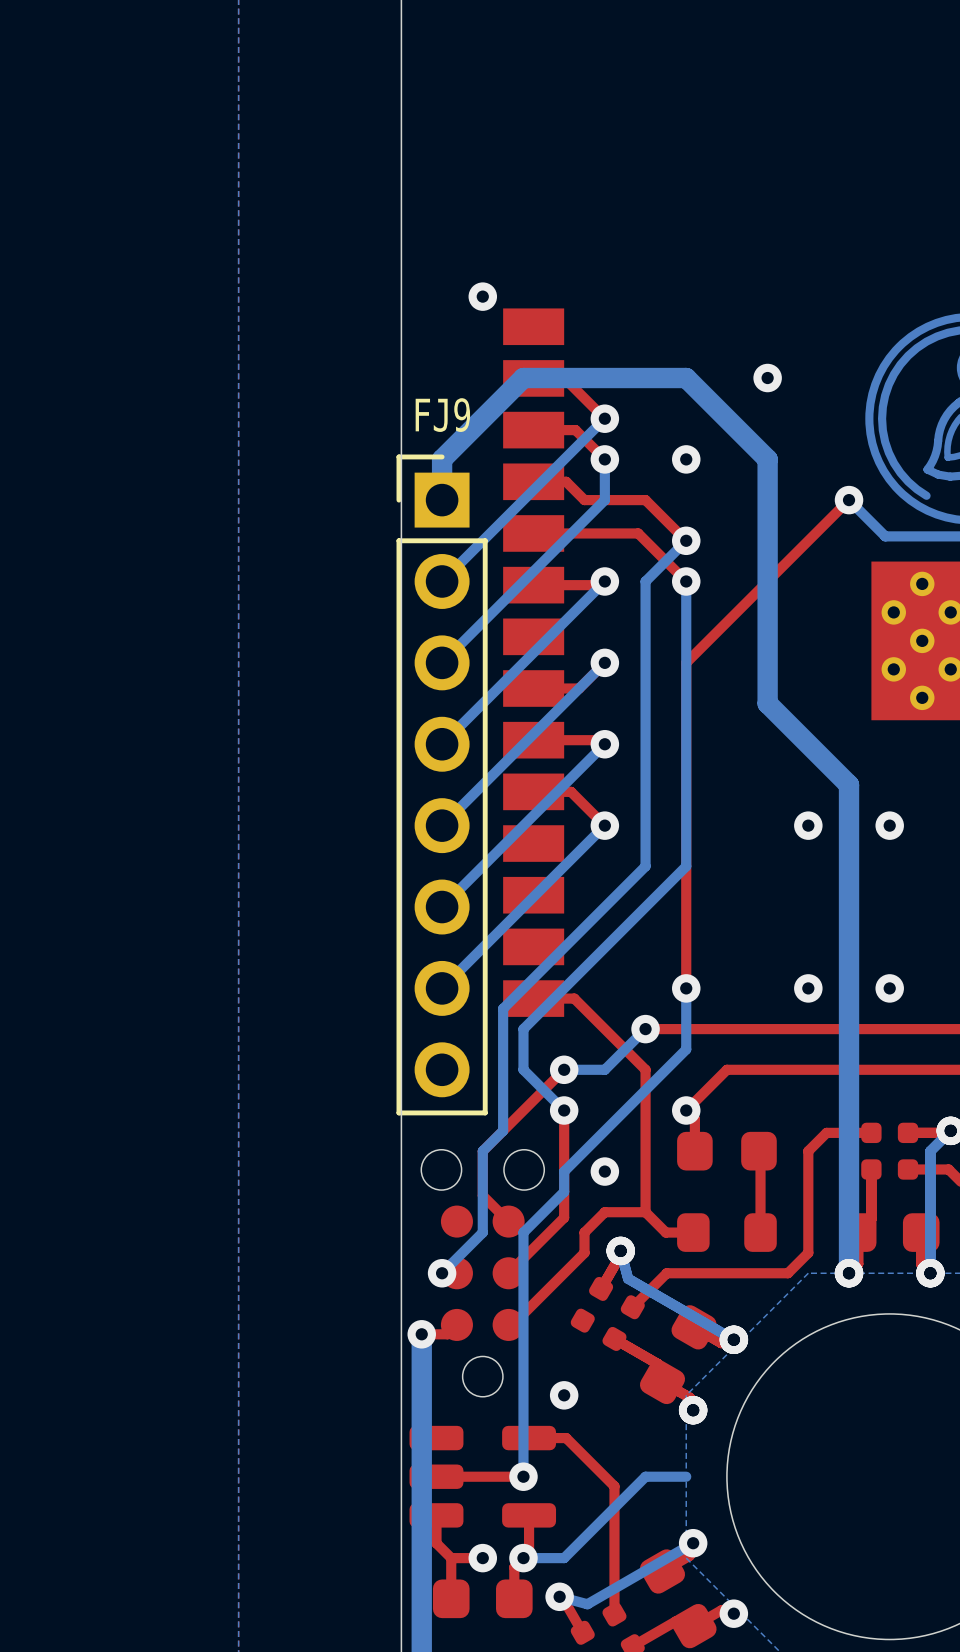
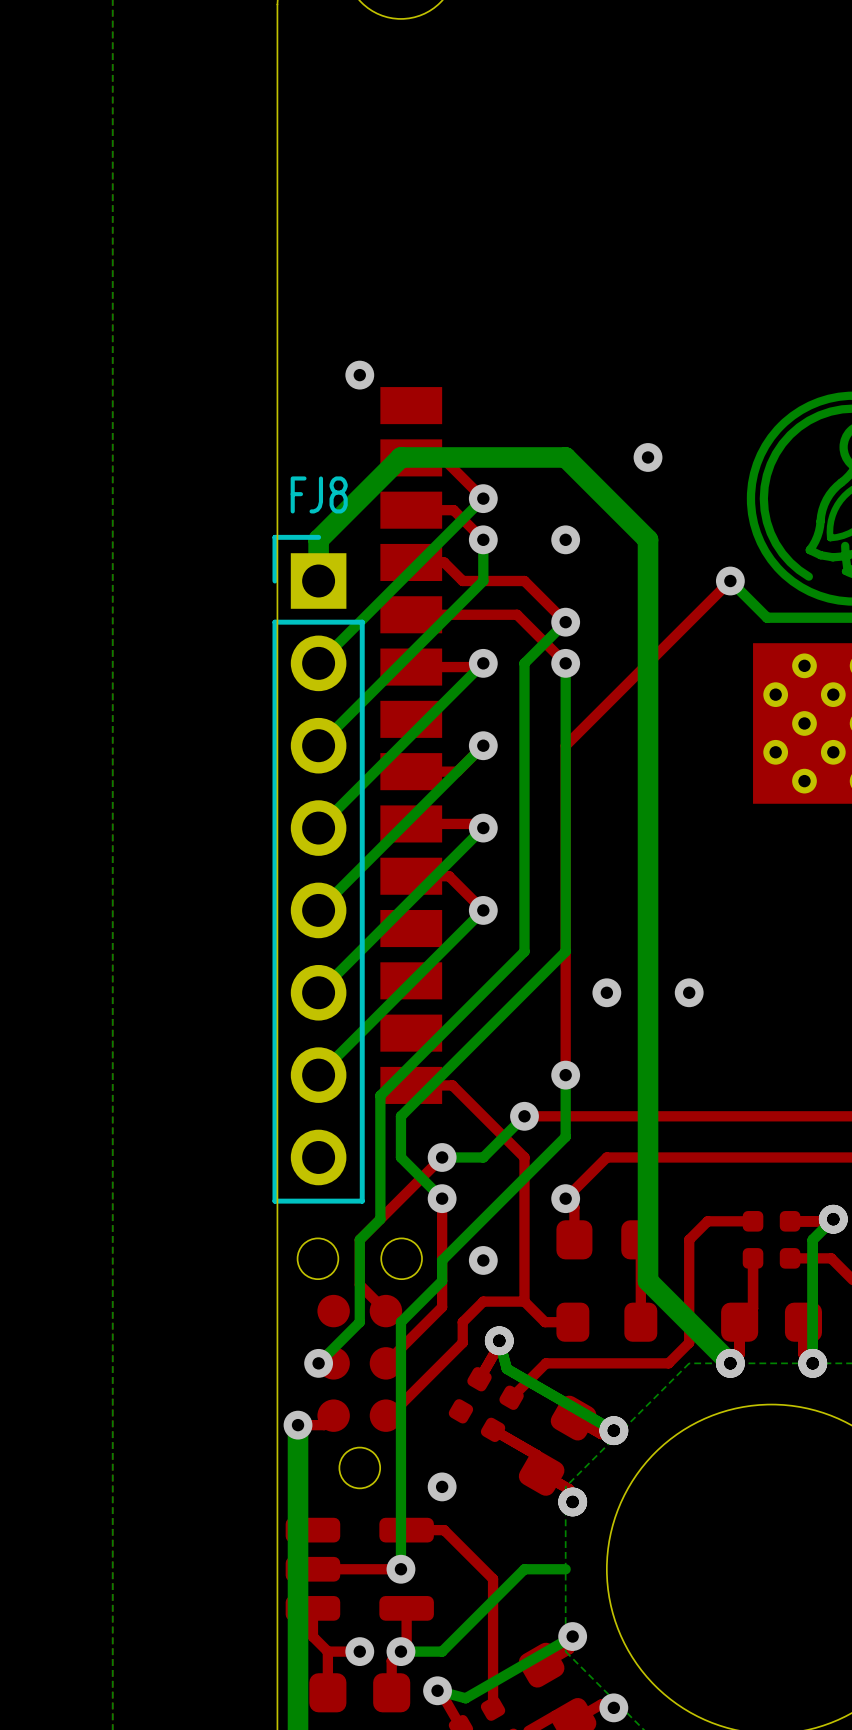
FJ9 name: FJ9 (442, 415) -> FJ8 (319, 494)
bottom track: (767, 703) (849, 784) (849, 1273) -> (648, 786) (648, 1281) (730, 1363)
via: (808, 825) -> none
via: (889, 825) -> none
via: none -> (606, 992)
via: none -> (689, 992)
via: (808, 988) -> none
via: (889, 988) -> none

